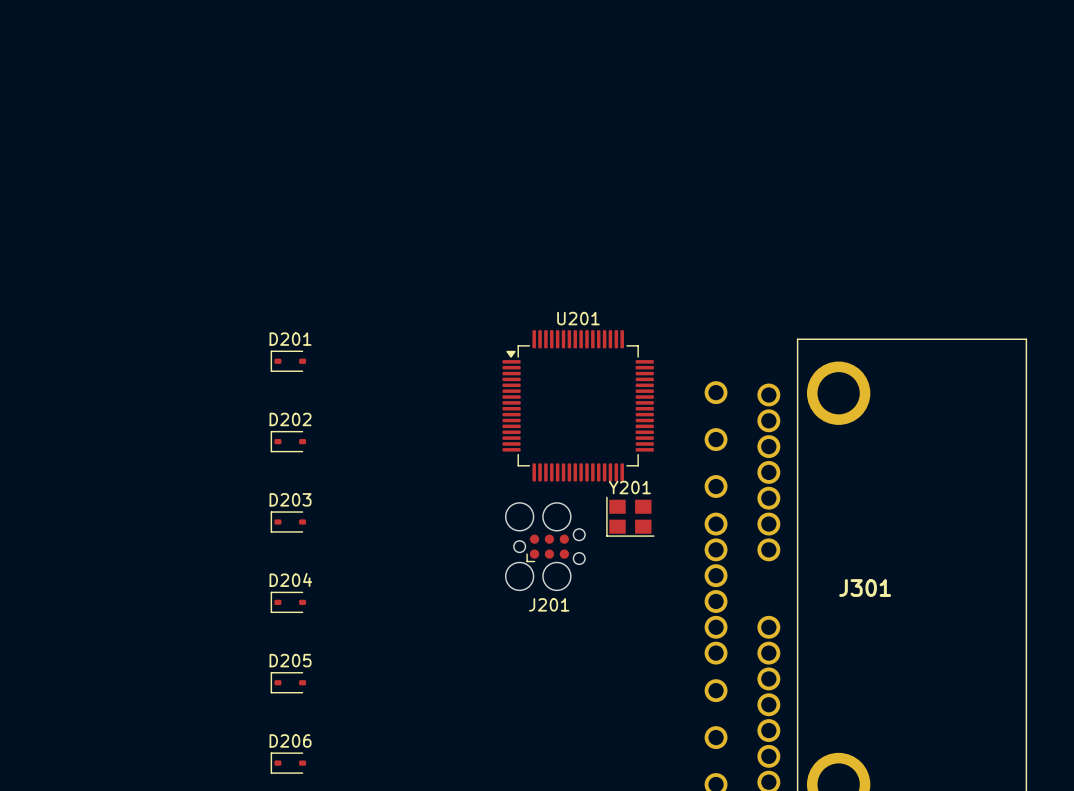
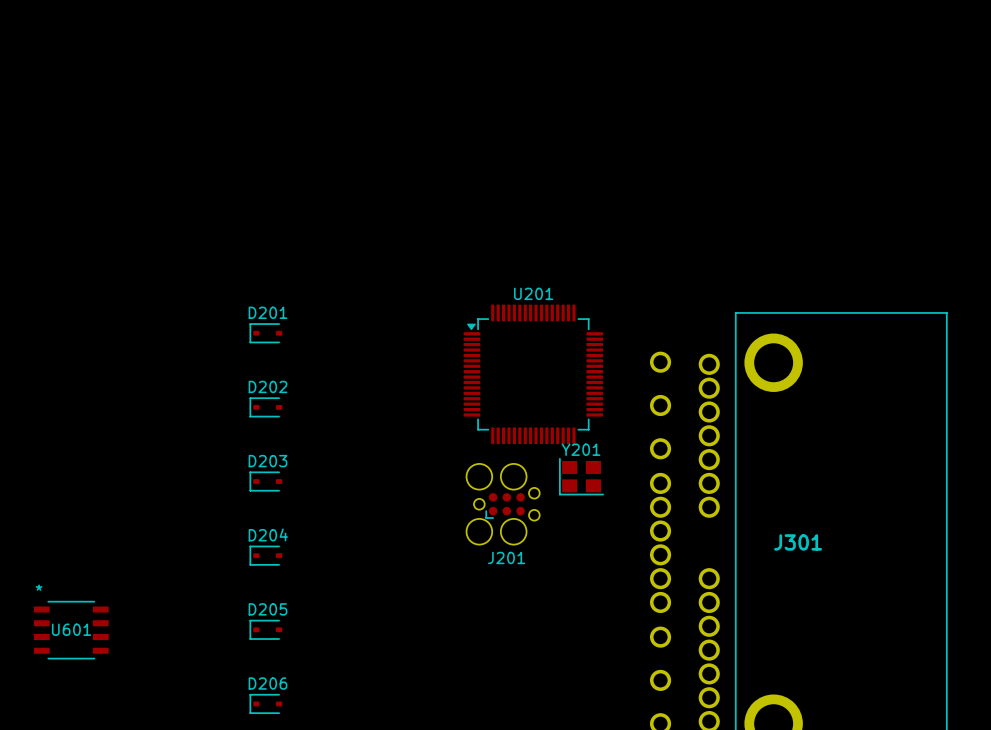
U601: none -> (71, 630)

